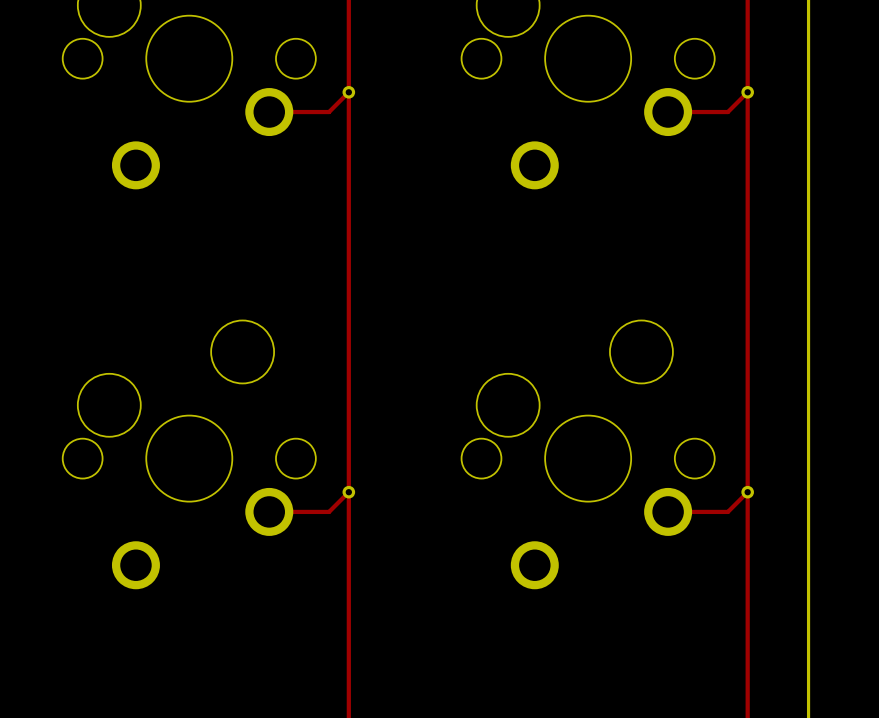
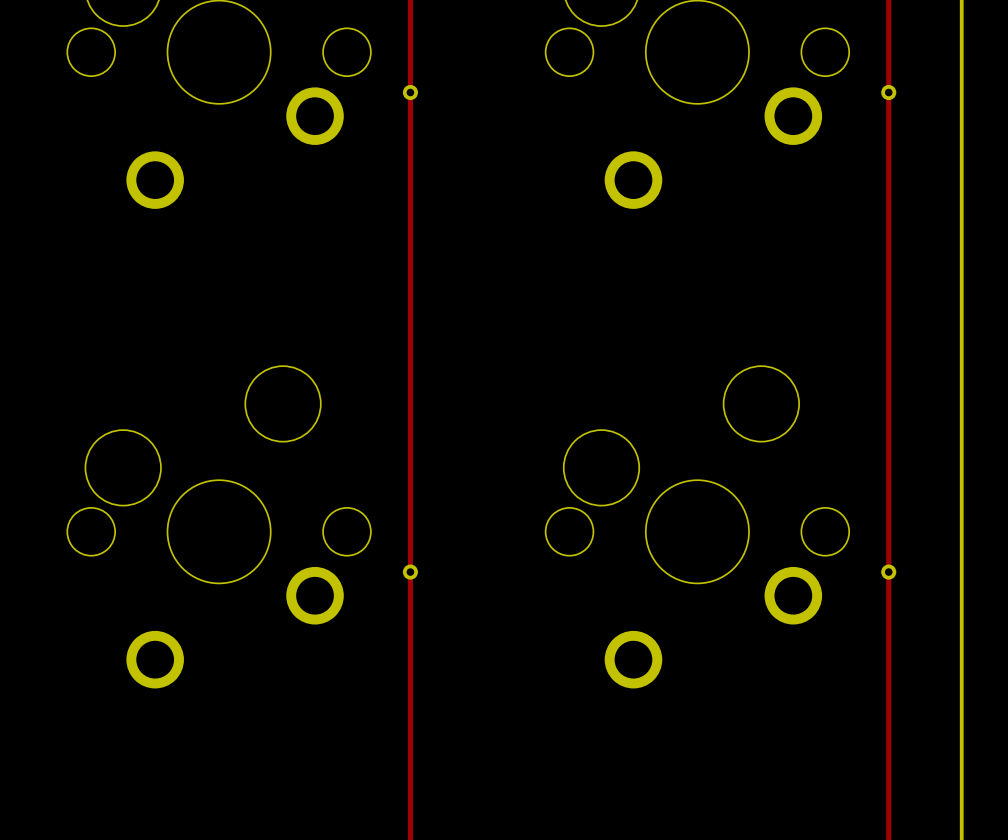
track: (348, 92) (329, 112) (269, 112) -> none
track: (747, 92) (727, 112) (668, 112) -> none
track: (348, 492) (329, 511) (269, 511) -> none
track: (747, 492) (727, 511) (668, 511) -> none

